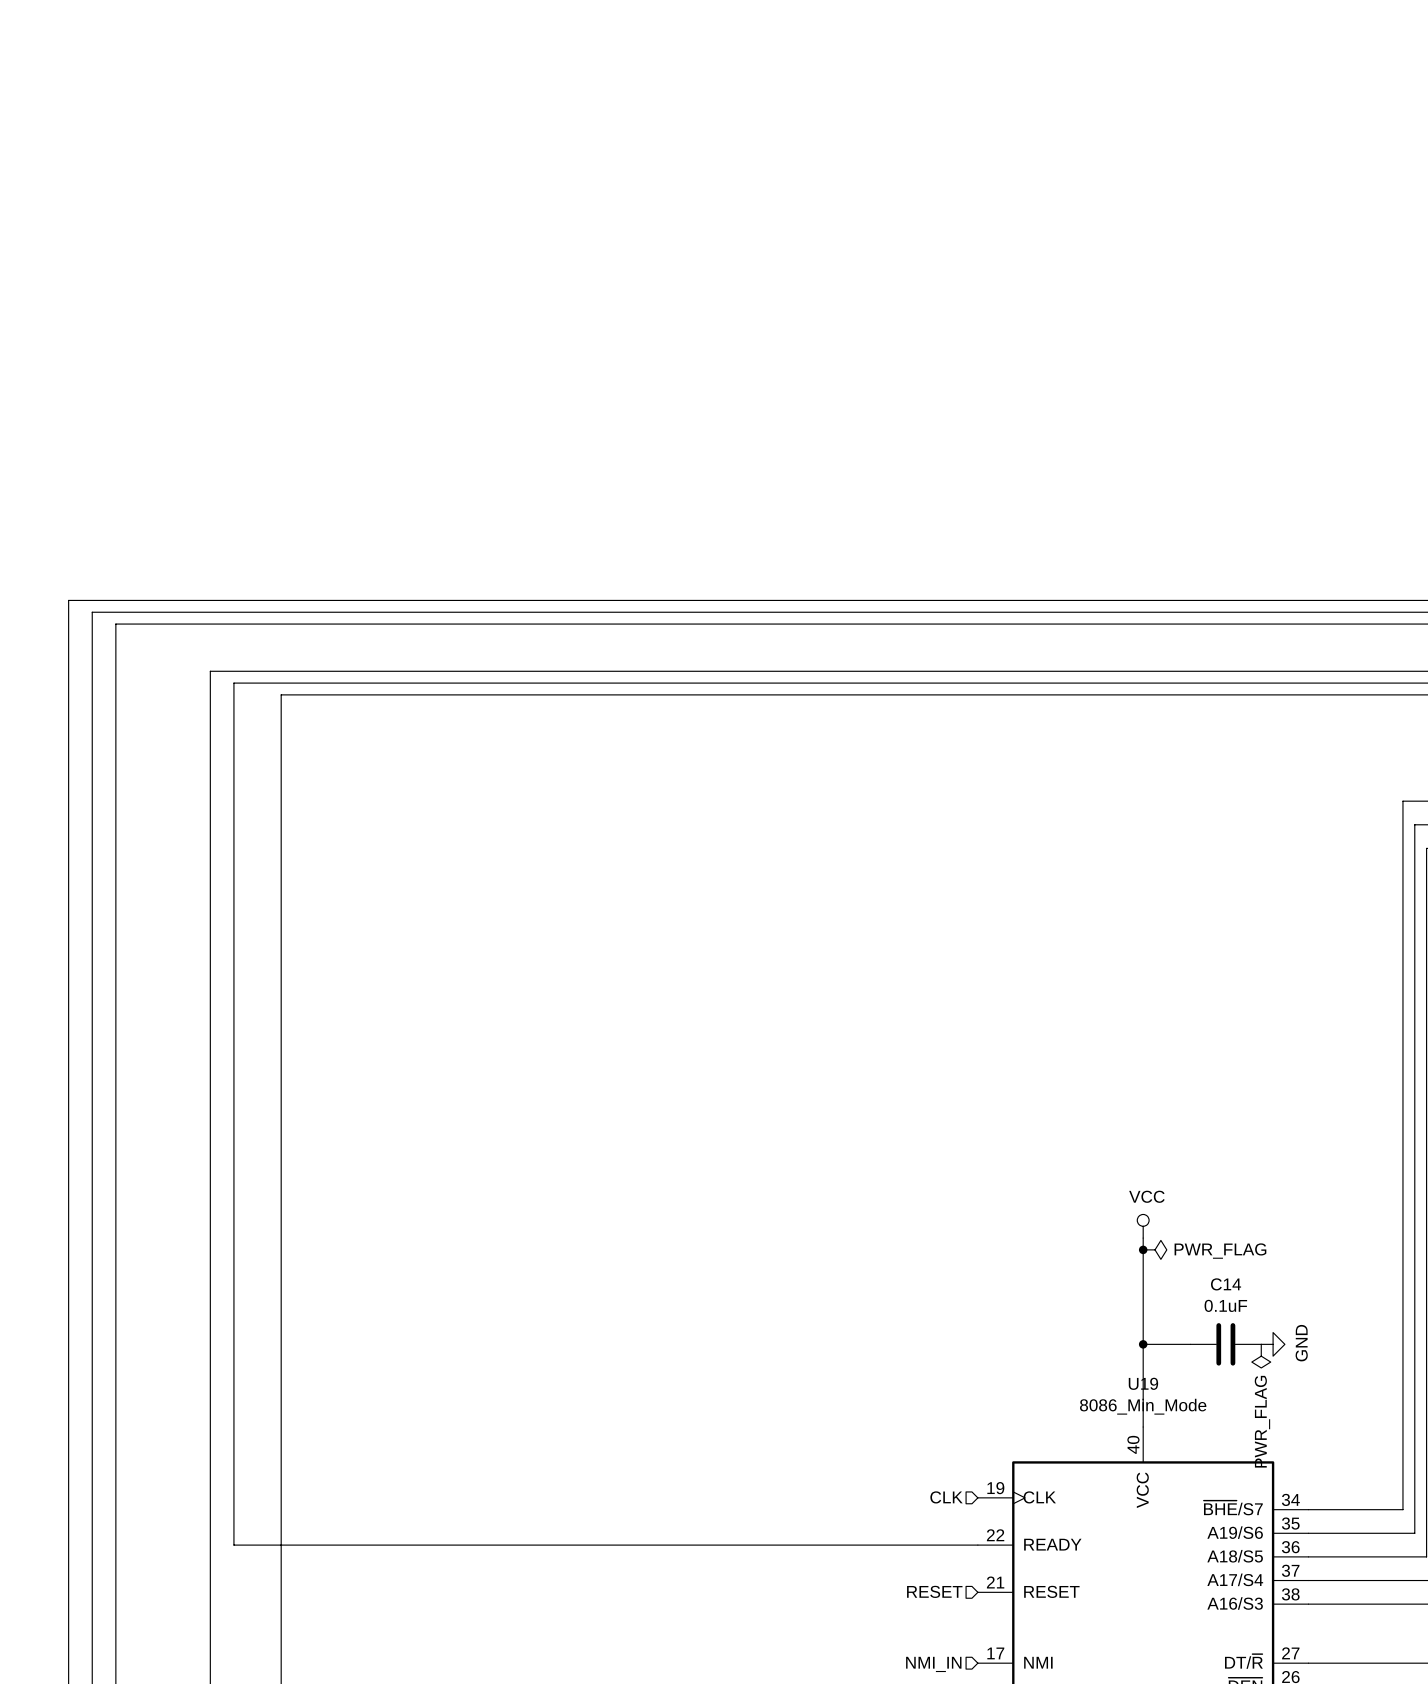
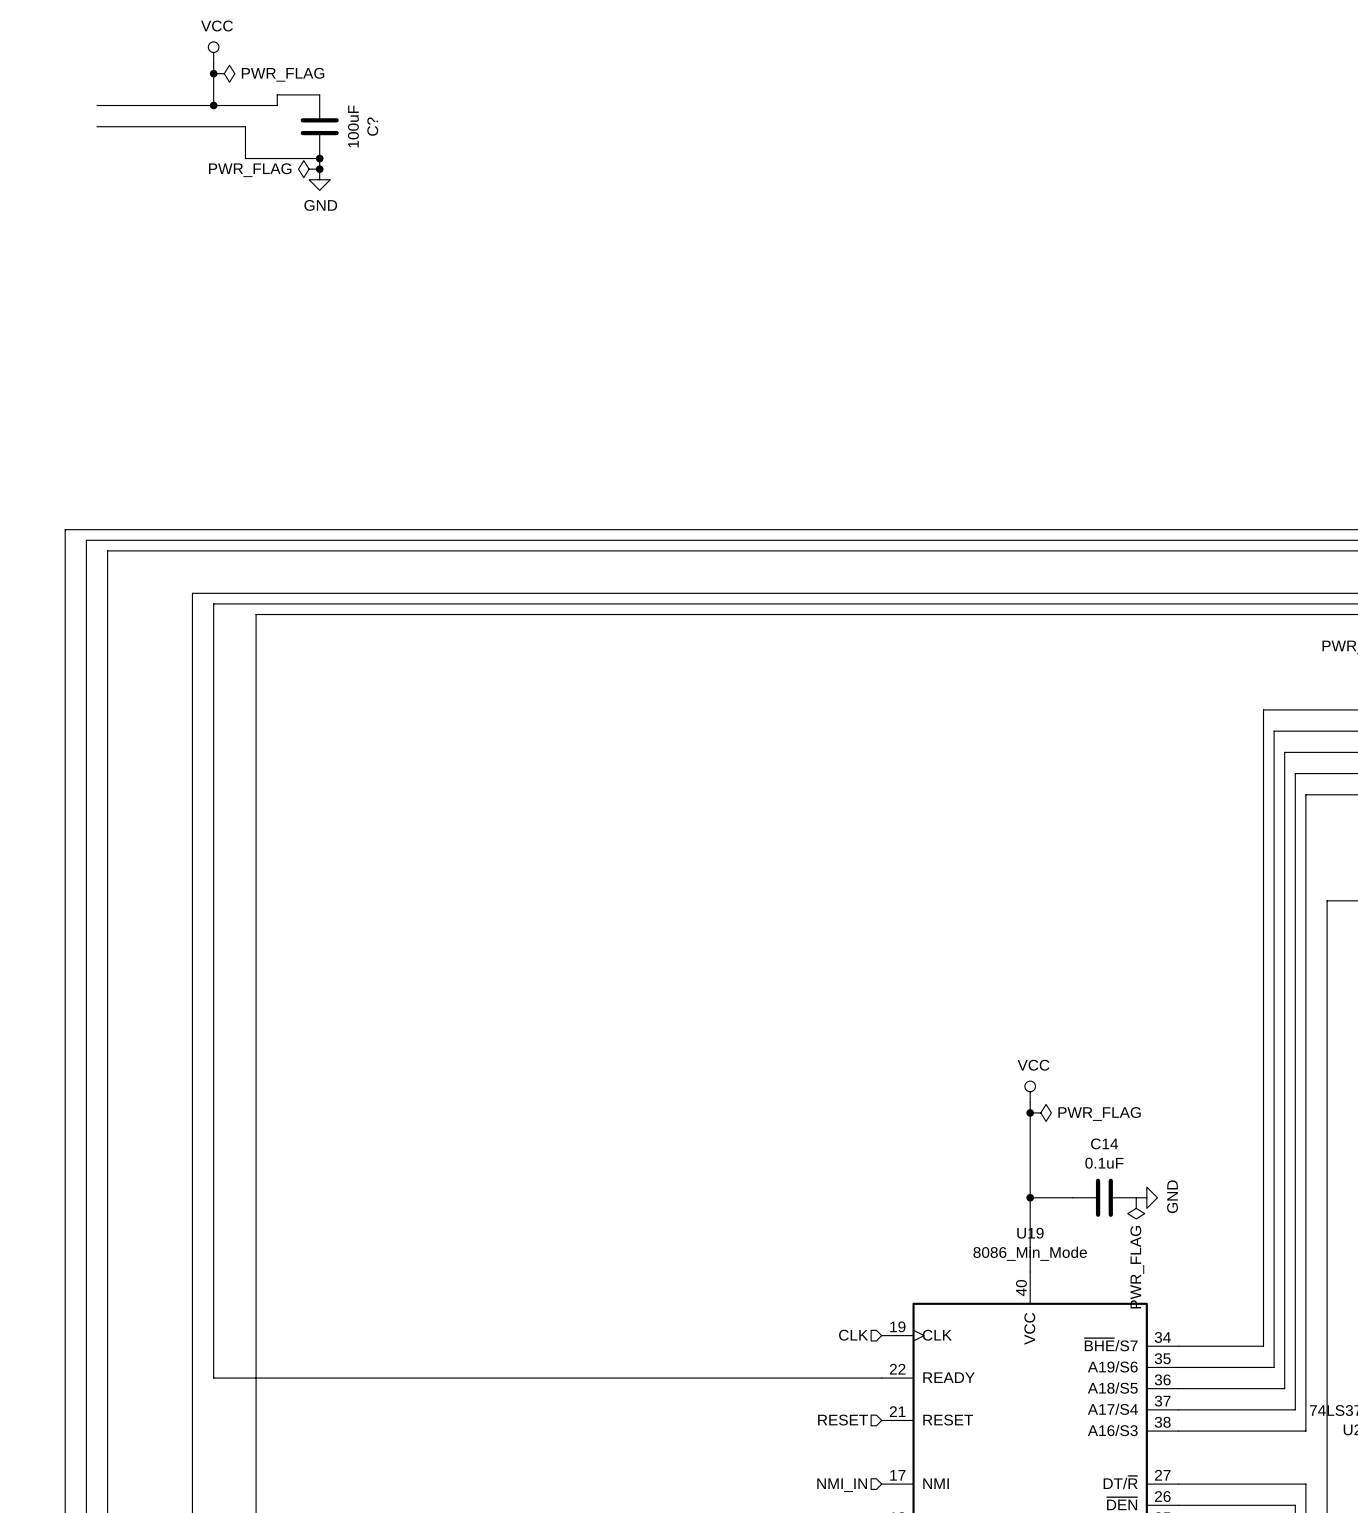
power symbol: none -> VCC (213, 52)
wire: none -> (213, 63) (213, 105)
junction: none -> (213, 73)
power symbol: none -> PWR_FLAG (224, 73)
wire: none -> (319, 94) (277, 94) (277, 105) (97, 105)
junction: none -> (213, 105)
wire: none -> (97, 126) (245, 126) (245, 158) (319, 158) (319, 169)
C?: none -> 100uF (319, 126)
junction: none -> (319, 158)
power symbol: none -> PWR_FLAG (309, 169)
junction: none -> (319, 169)
power symbol: none -> GND (319, 179)

